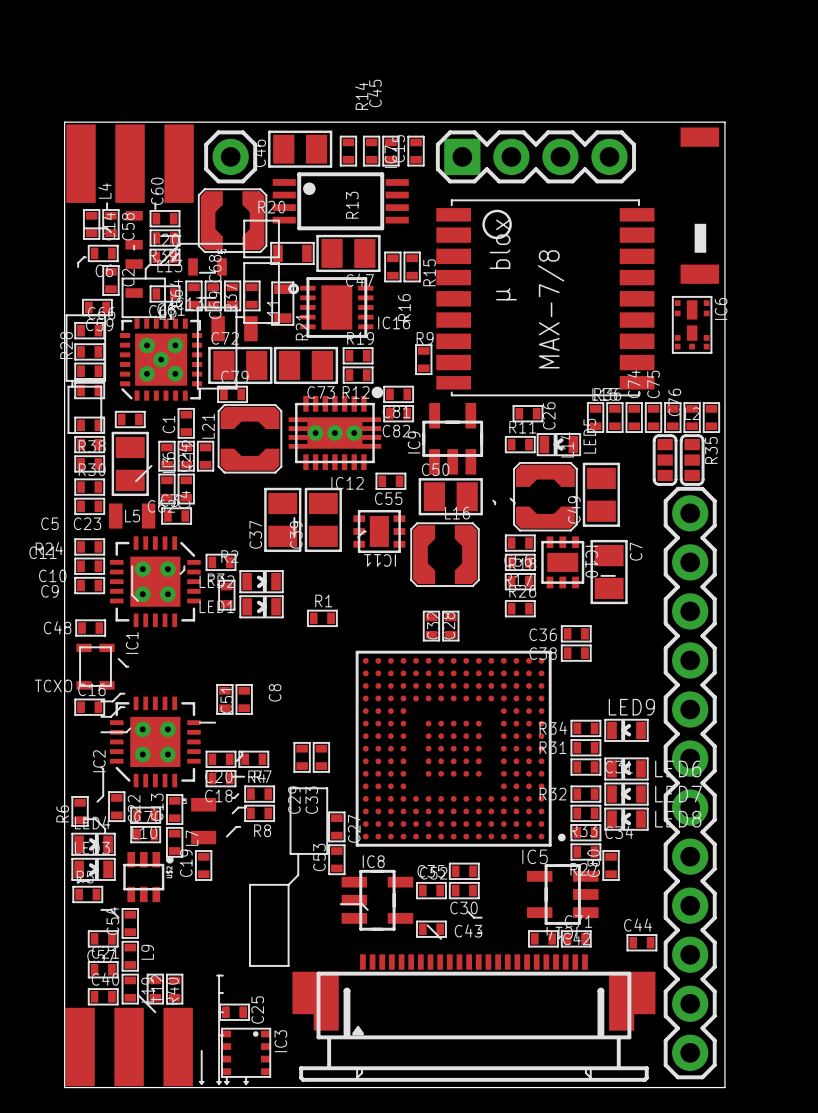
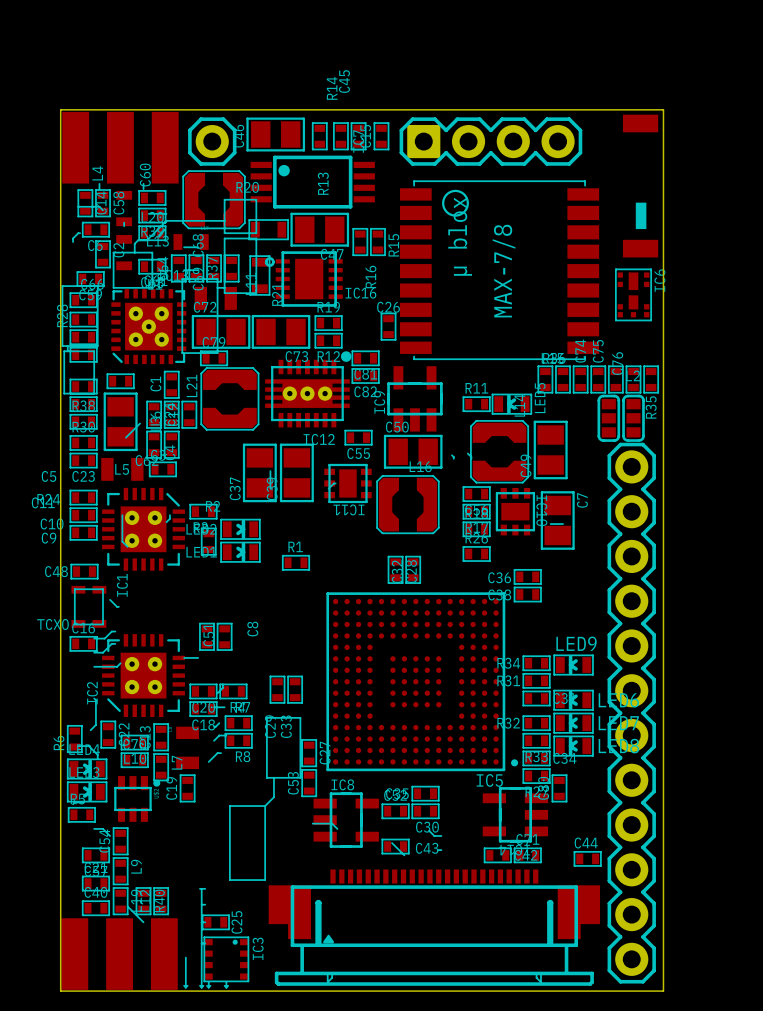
R9 name: R9 (425, 338) -> C26 (388, 307)
C26: (528, 413) -> none

